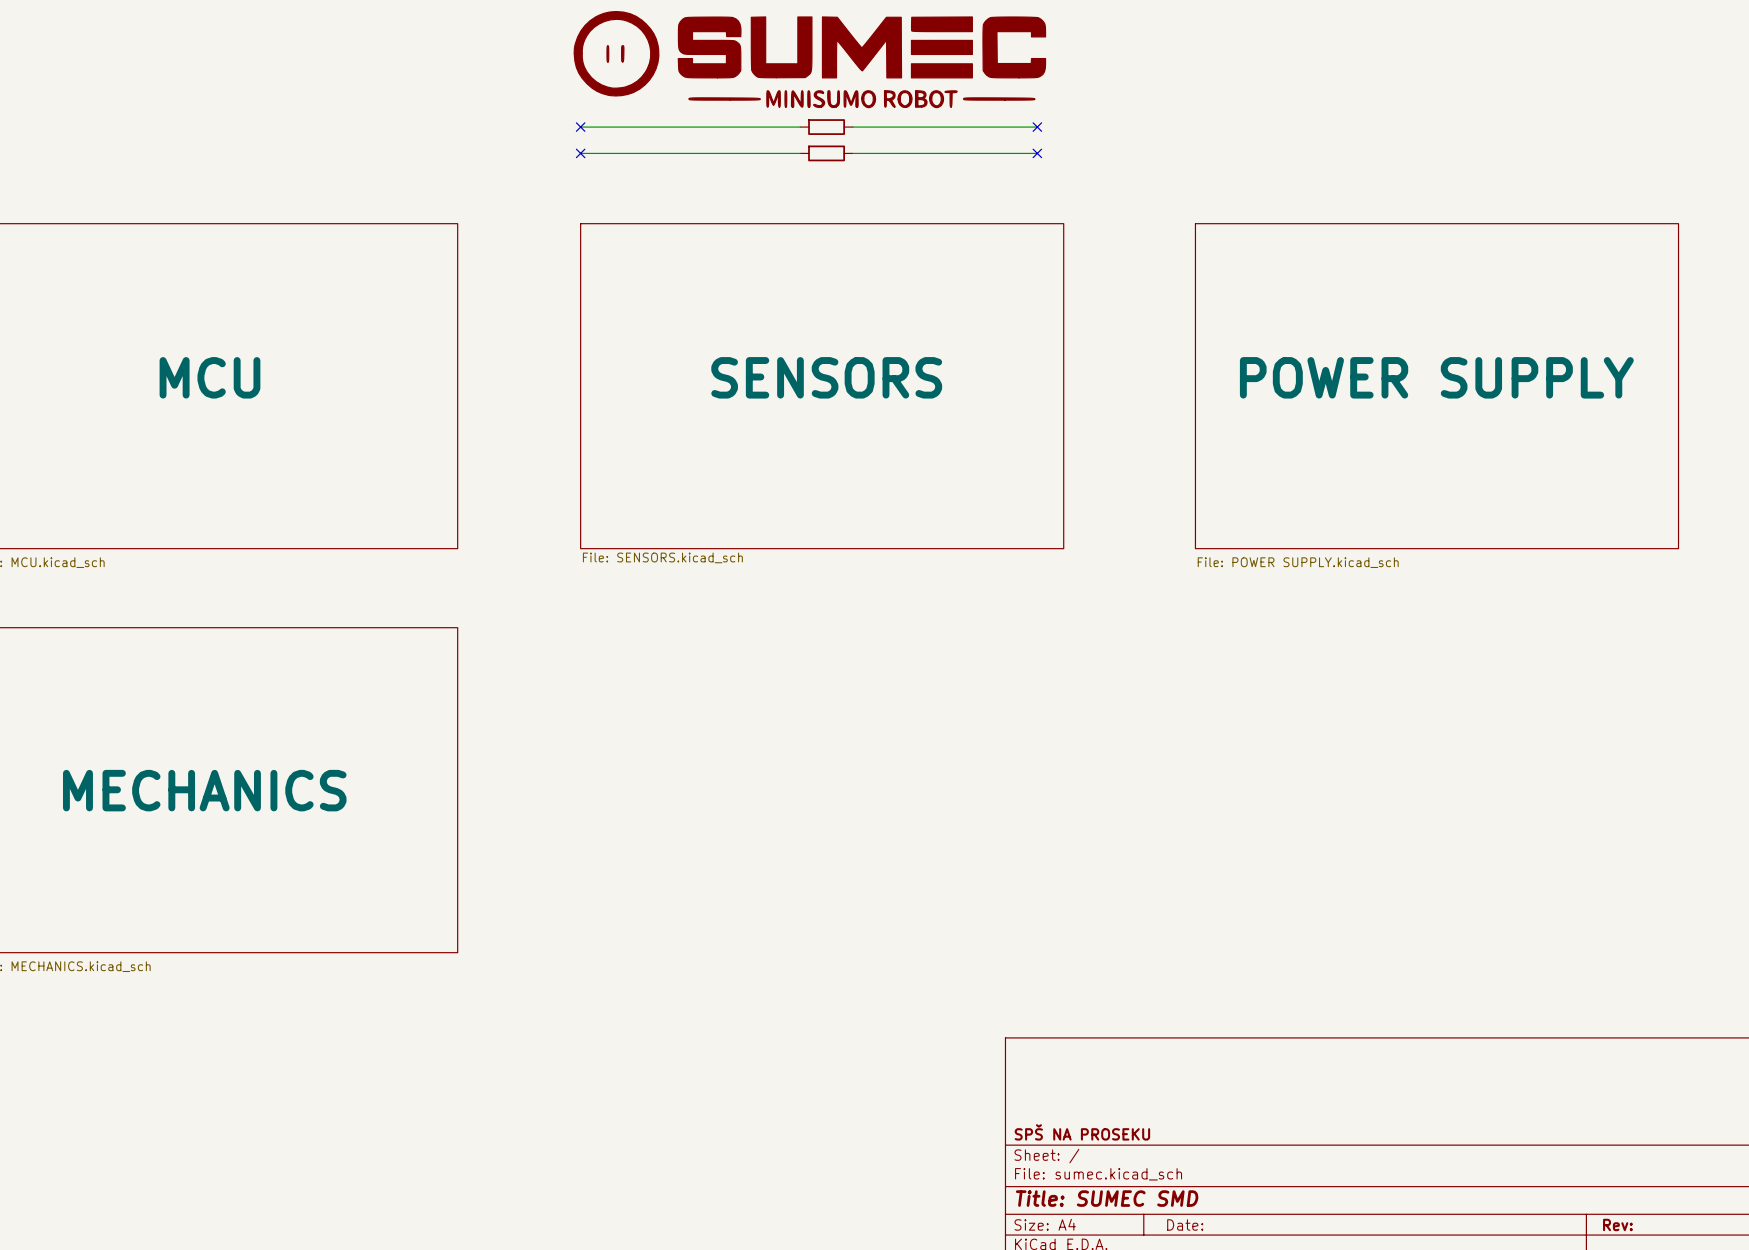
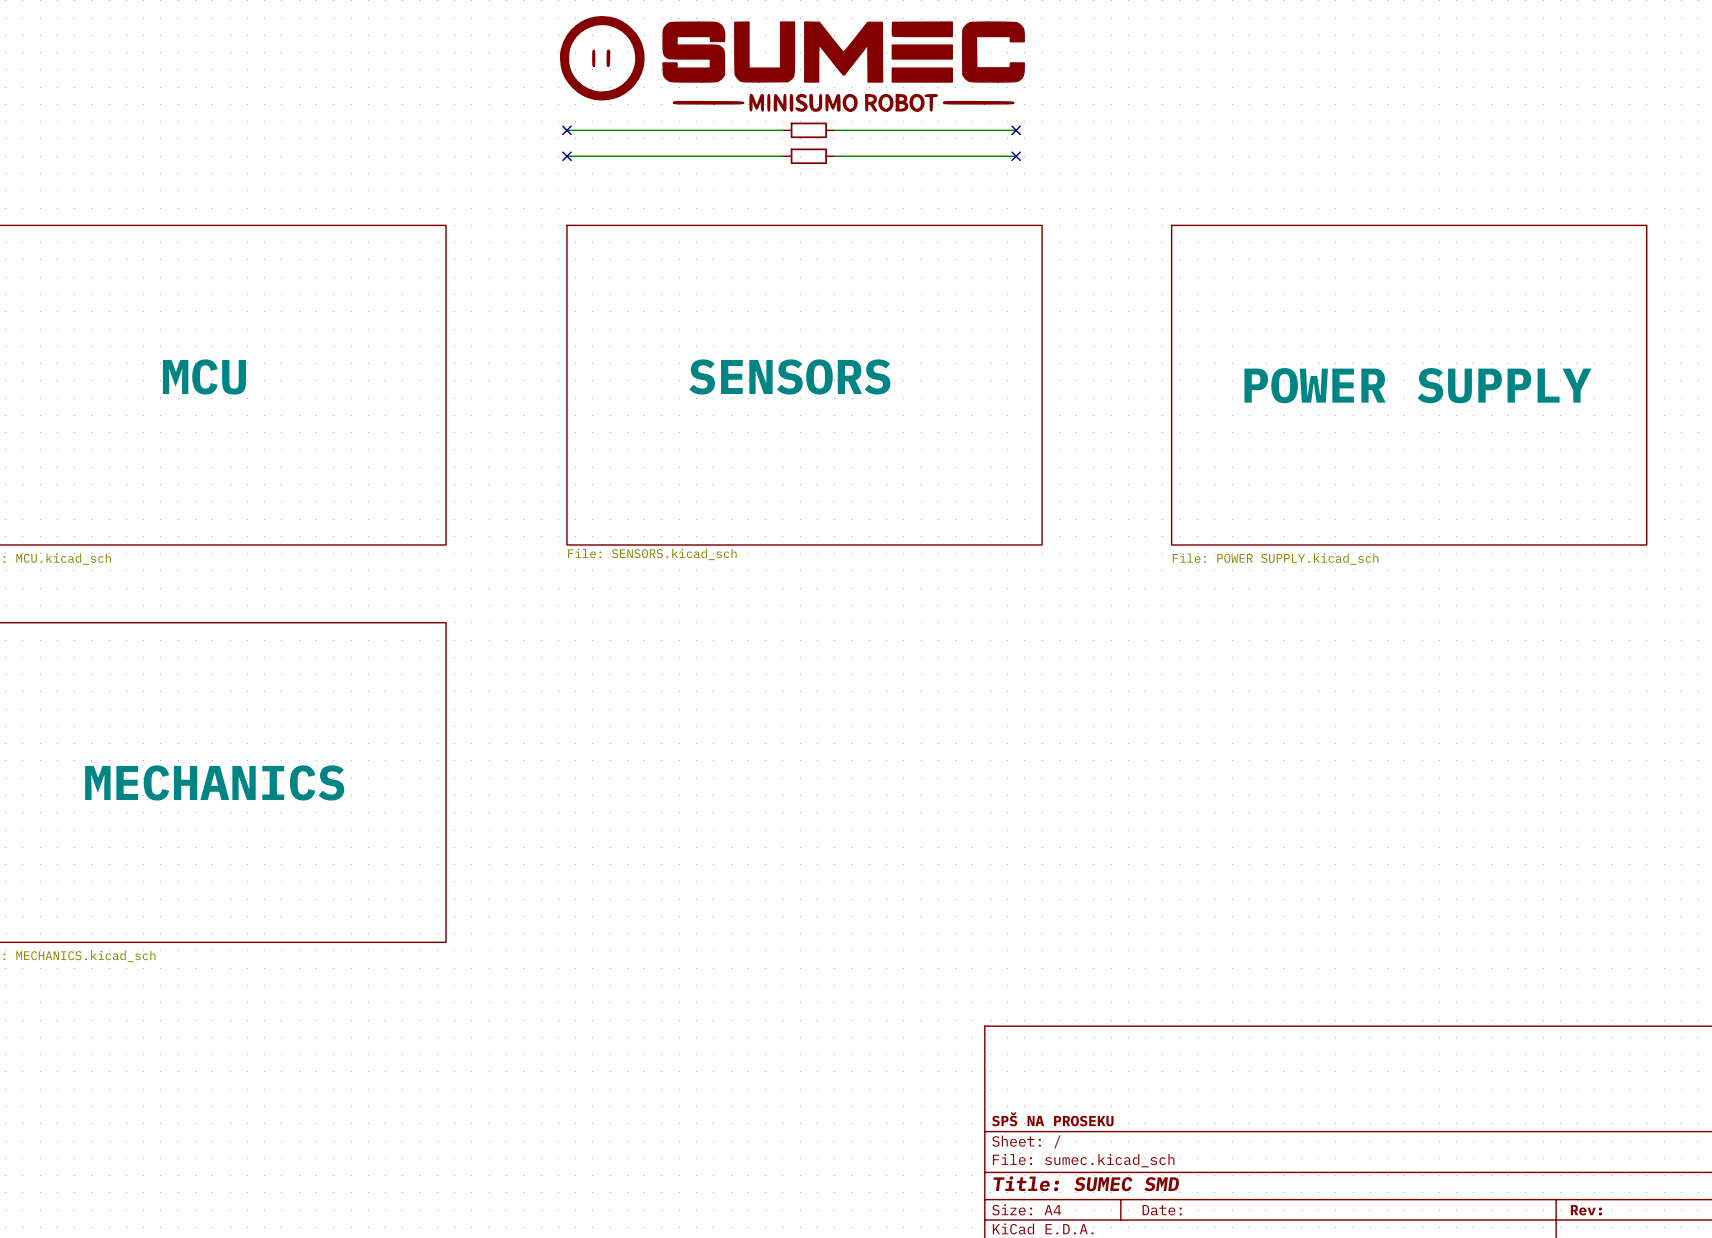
sheet MCU name position: MCU (209, 377) -> MCU (204, 376)
sheet POWER SUPPLY name position: POWER SUPPLY (1436, 377) -> POWER SUPPLY (1417, 385)
sheet MECHANICS name position: MECHANICS (204, 790) -> MECHANICS (214, 782)

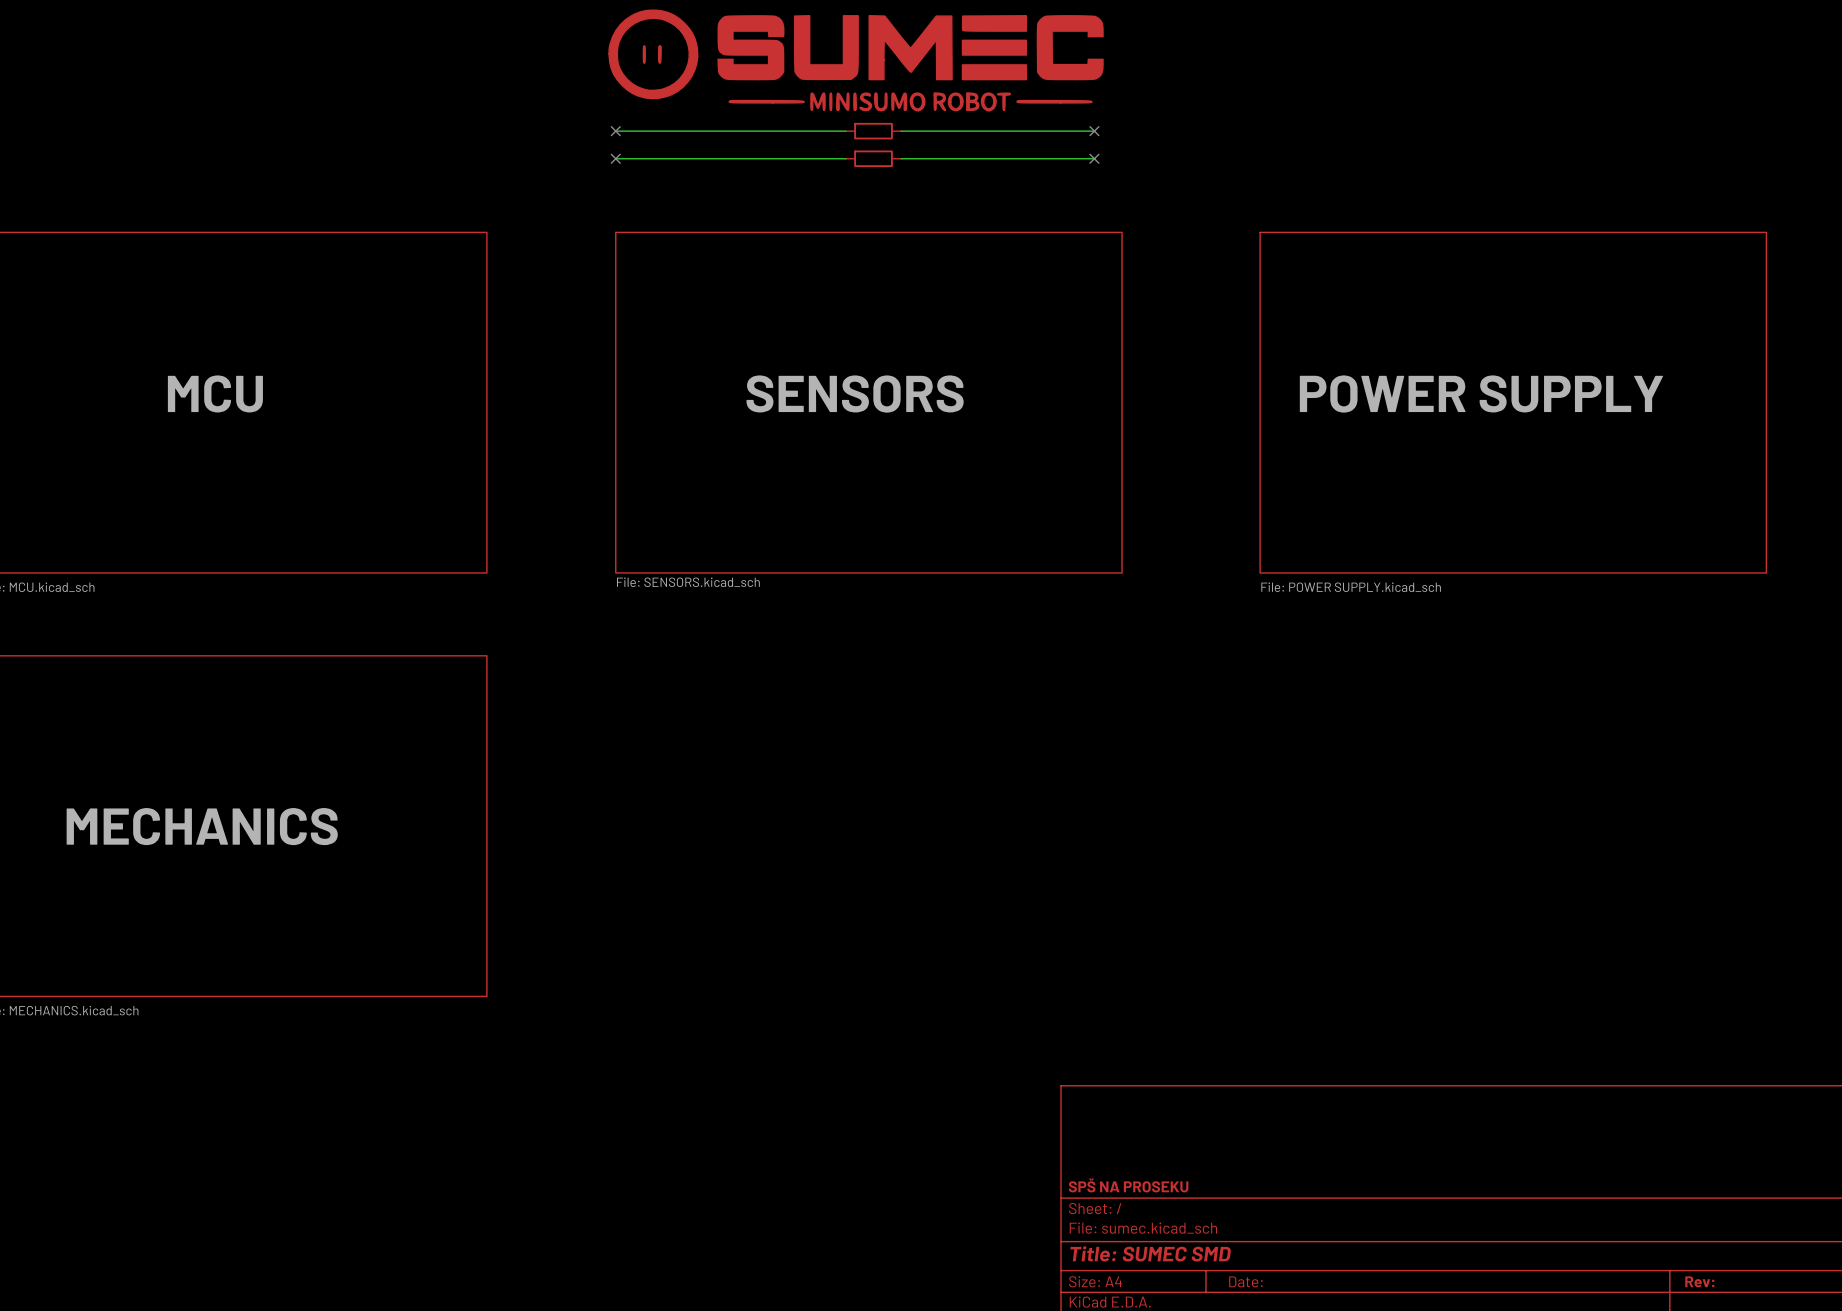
sheet MCU name position: MCU (204, 376) -> MCU (215, 393)
sheet POWER SUPPLY name position: POWER SUPPLY (1417, 385) -> POWER SUPPLY (1481, 394)
sheet MECHANICS name position: MECHANICS (214, 782) -> MECHANICS (202, 826)

